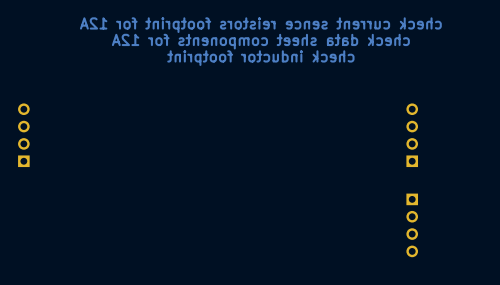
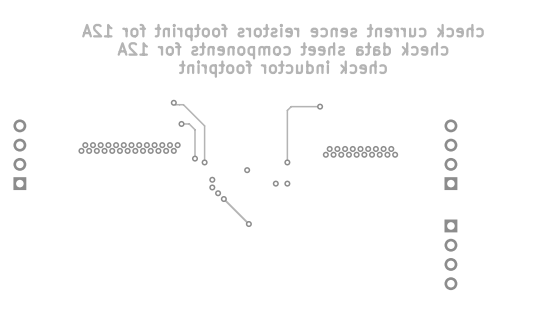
track: none -> (173, 102) (175, 104) (183, 104) (204, 125) (204, 162)
via: none -> (173, 102)
track: none -> (320, 106) (291, 106) (287, 110) (287, 162)
via: none -> (320, 106)
track: none -> (181, 123) (189, 123) (194, 129) (194, 158)
via: none -> (181, 123)
via: none -> (85, 145)
via: none -> (92, 145)
via: none -> (100, 145)
via: none -> (108, 145)
via: none -> (116, 145)
via: none -> (123, 145)
via: none -> (131, 145)
via: none -> (139, 145)
via: none -> (146, 145)
via: none -> (154, 145)
via: none -> (162, 145)
via: none -> (169, 145)
via: none -> (177, 145)
via: none -> (329, 148)
via: none -> (337, 148)
via: none -> (345, 148)
via: none -> (352, 148)
via: none -> (360, 148)
via: none -> (368, 148)
via: none -> (375, 148)
via: none -> (383, 148)
via: none -> (391, 148)
via: none -> (81, 150)
via: none -> (89, 150)
via: none -> (96, 150)
via: none -> (104, 150)
via: none -> (112, 150)
via: none -> (119, 150)
via: none -> (127, 150)
via: none -> (135, 150)
via: none -> (143, 150)
via: none -> (150, 150)
via: none -> (158, 150)
via: none -> (166, 150)
via: none -> (173, 150)
via: none -> (325, 154)
via: none -> (333, 154)
via: none -> (341, 154)
via: none -> (348, 154)
via: none -> (356, 154)
via: none -> (364, 154)
via: none -> (372, 154)
via: none -> (379, 154)
via: none -> (387, 154)
via: none -> (395, 154)
via: none -> (194, 158)
via: none -> (204, 162)
via: none -> (287, 162)
via: none -> (247, 170)
via: none -> (212, 179)
via: none -> (275, 183)
via: none -> (287, 183)
via: none -> (212, 187)
via: none -> (218, 193)
track: none -> (223, 199) (248, 224)
via: none -> (223, 199)
via: none -> (248, 224)

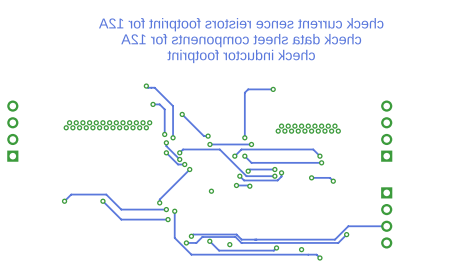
track: none -> (182, 114) (203, 136) (208, 136)
via: none -> (182, 114)
via: none -> (208, 136)
track: none -> (166, 142) (166, 146) (179, 159)
via: none -> (166, 142)
track: none -> (251, 144) (209, 144)
via: none -> (251, 144)
track: none -> (166, 152) (178, 164) (184, 164)
via: none -> (166, 152)
track: none -> (179, 152) (183, 149) (219, 149) (246, 176) (274, 176)
track: none -> (244, 156) (251, 162) (321, 162)
track: none -> (319, 156) (313, 149) (241, 149) (234, 156)
via: none -> (319, 156)
via: none -> (321, 162)
track: (223, 199) (248, 224) -> (189, 169) (159, 199) (159, 202)
track: none -> (274, 169) (249, 169) (248, 171)
via: none -> (274, 169)
via: none -> (248, 171)
track: none -> (281, 172) (281, 176) (277, 180) (244, 180) (239, 176)
via: none -> (281, 172)
via: none -> (239, 176)
via: none -> (274, 176)
track: none -> (311, 177) (329, 177) (333, 181)
via: none -> (311, 177)
via: none -> (333, 181)
track: none -> (236, 185) (249, 186)
via: none -> (236, 185)
via: none -> (249, 186)
track: none -> (64, 201) (71, 194) (106, 194) (121, 209) (166, 209)
via: none -> (64, 201)
track: none -> (102, 201) (121, 219) (168, 219)
via: none -> (102, 201)
via: none -> (159, 202)
via: none -> (166, 209)
track: none -> (174, 211) (174, 237) (191, 254) (316, 254) (319, 257)
via: none -> (174, 211)
via: none -> (168, 219)
track: none -> (384, 228) (386, 226) (348, 226) (334, 239) (241, 239) (236, 234) (193, 234) (191, 236)
track: none -> (346, 234) (338, 242) (241, 242) (235, 237) (202, 237) (196, 242) (186, 242)
via: none -> (346, 234)
via: none -> (191, 236)
track: none -> (209, 241) (219, 250) (273, 250) (276, 247)
via: none -> (209, 241)
via: none -> (186, 242)
via: none -> (229, 244)
via: none -> (276, 247)
via: none -> (301, 249)
via: none -> (319, 257)

